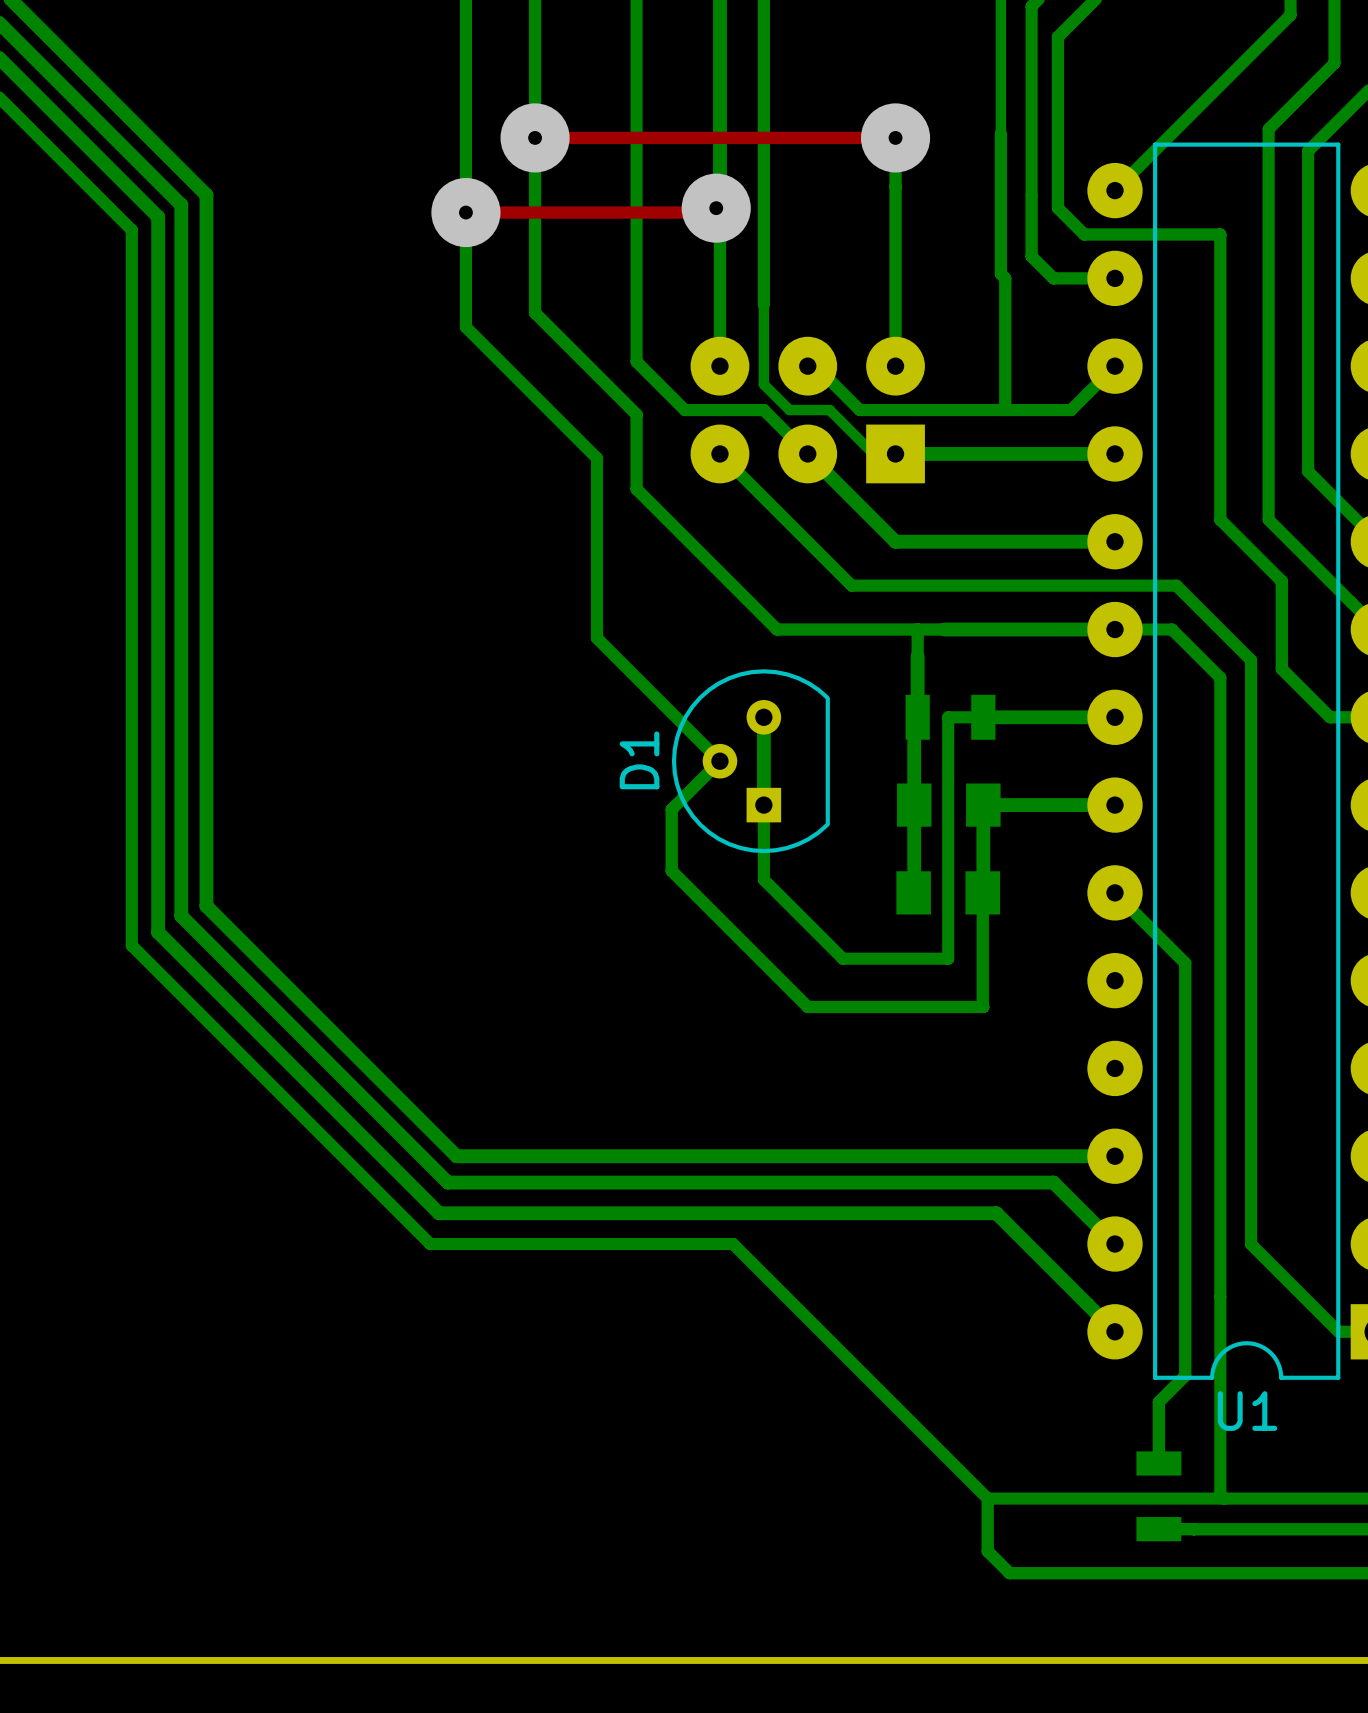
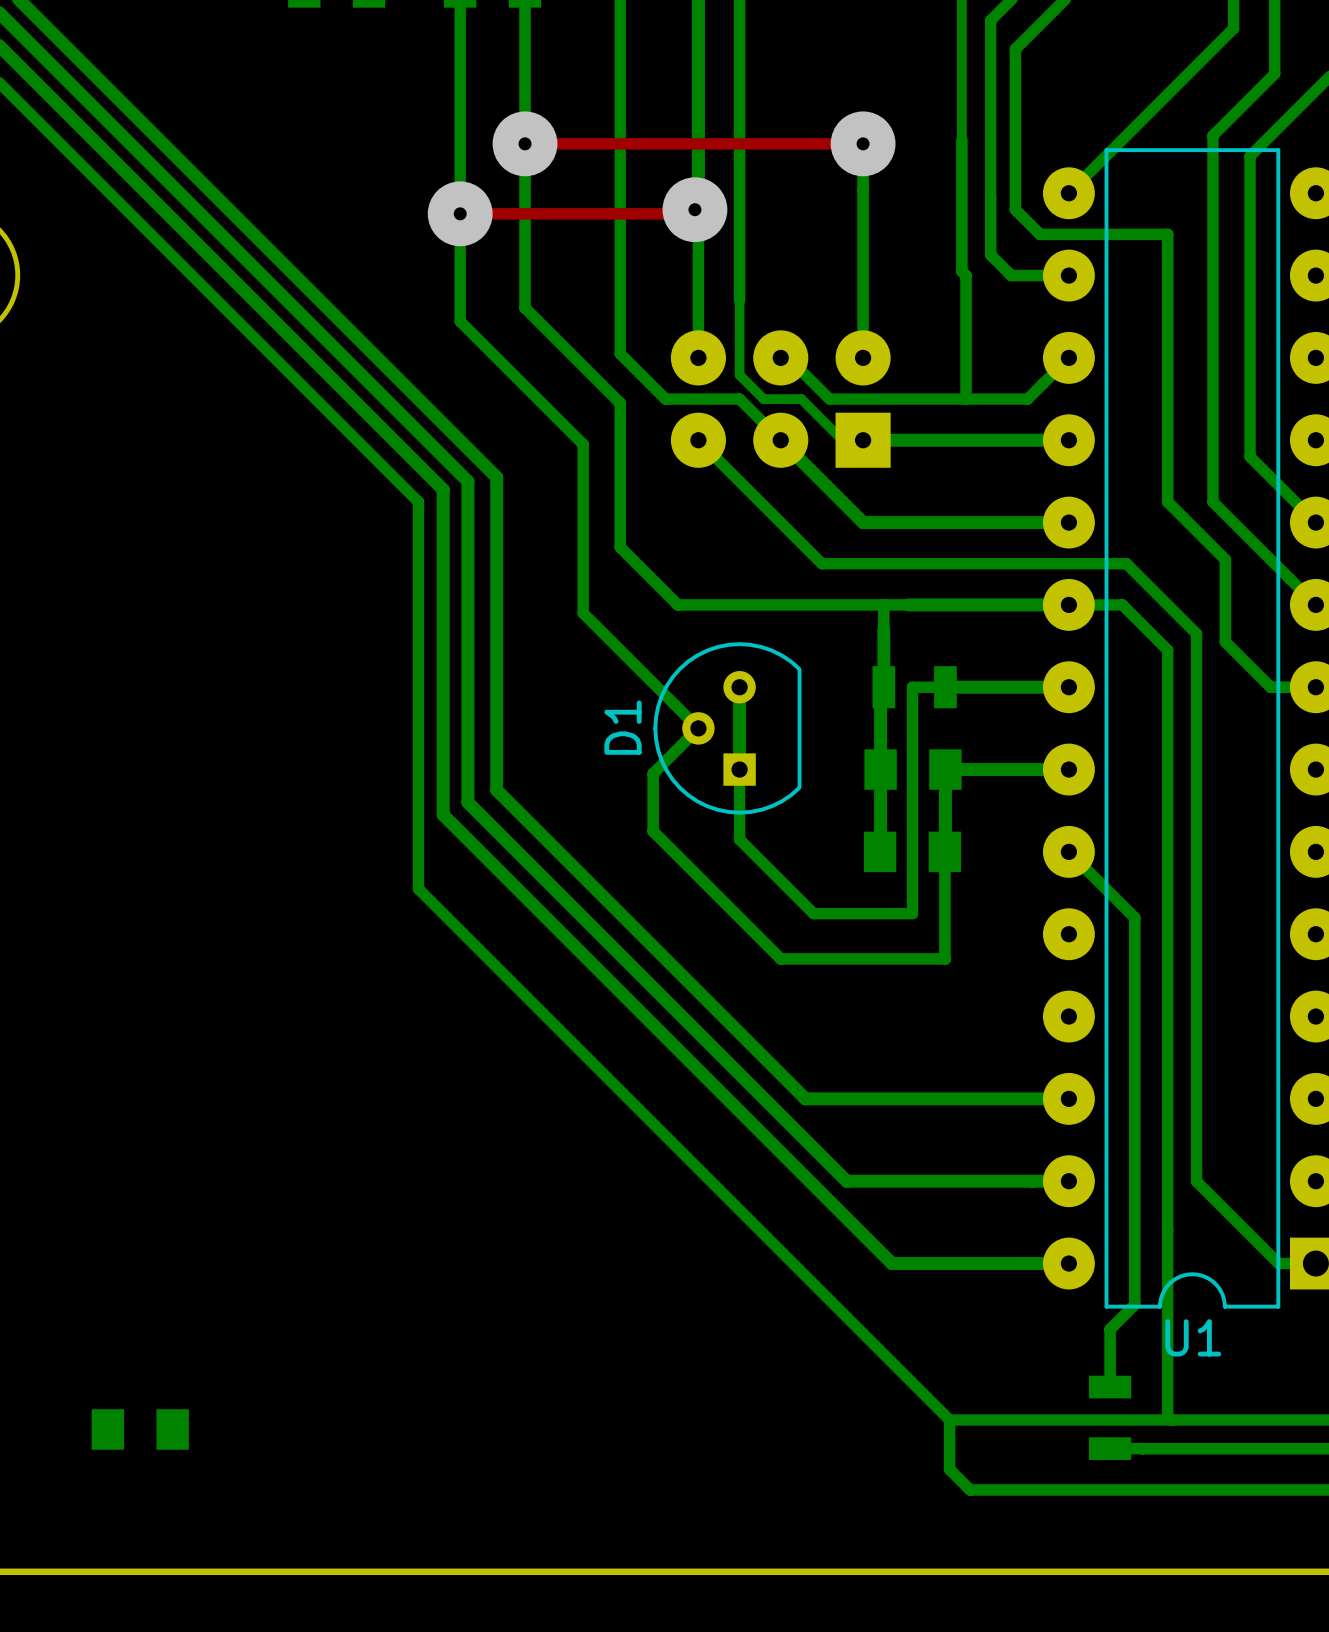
bottom track: (206, 194) (206, 906) (456, 1156) (834, 1156) -> (216, 197) (496, 477) (496, 790) (805, 1098)
bottom track: (181, 204) (181, 916) (447, 1182) (1053, 1182) (1115, 1244) -> (193, 206) (467, 481) (467, 802) (846, 1181) (1068, 1181)
bottom track: (158, 216) (158, 932) (439, 1213) (996, 1213) (1115, 1331) -> (171, 217) (443, 489) (443, 814) (891, 1263) (1068, 1263)
bottom track: (131, 230) (131, 945) (430, 1244) (733, 1244) -> (146, 230) (418, 501) (418, 888) (710, 1181)
bottom track: (636, 489) (777, 629) -> (620, 473) (620, 547) (677, 604) (751, 604)
part: none -> (140, 1429)

